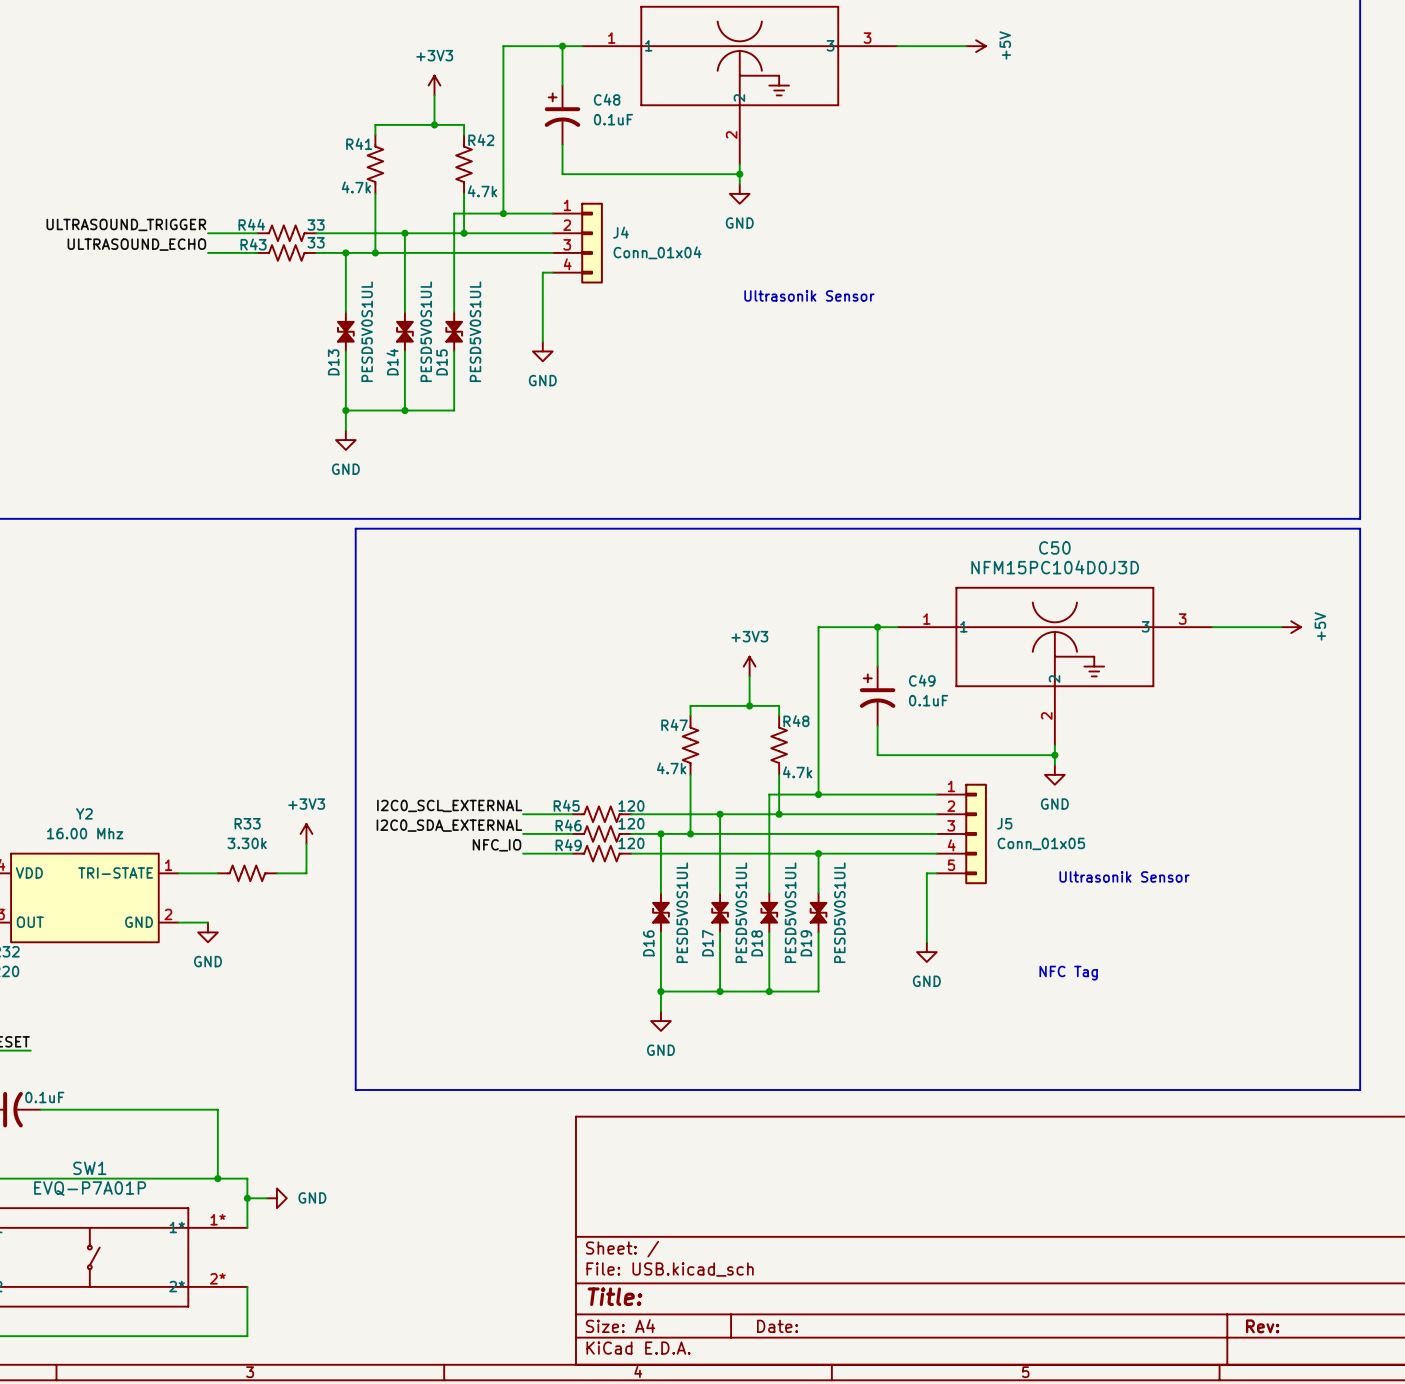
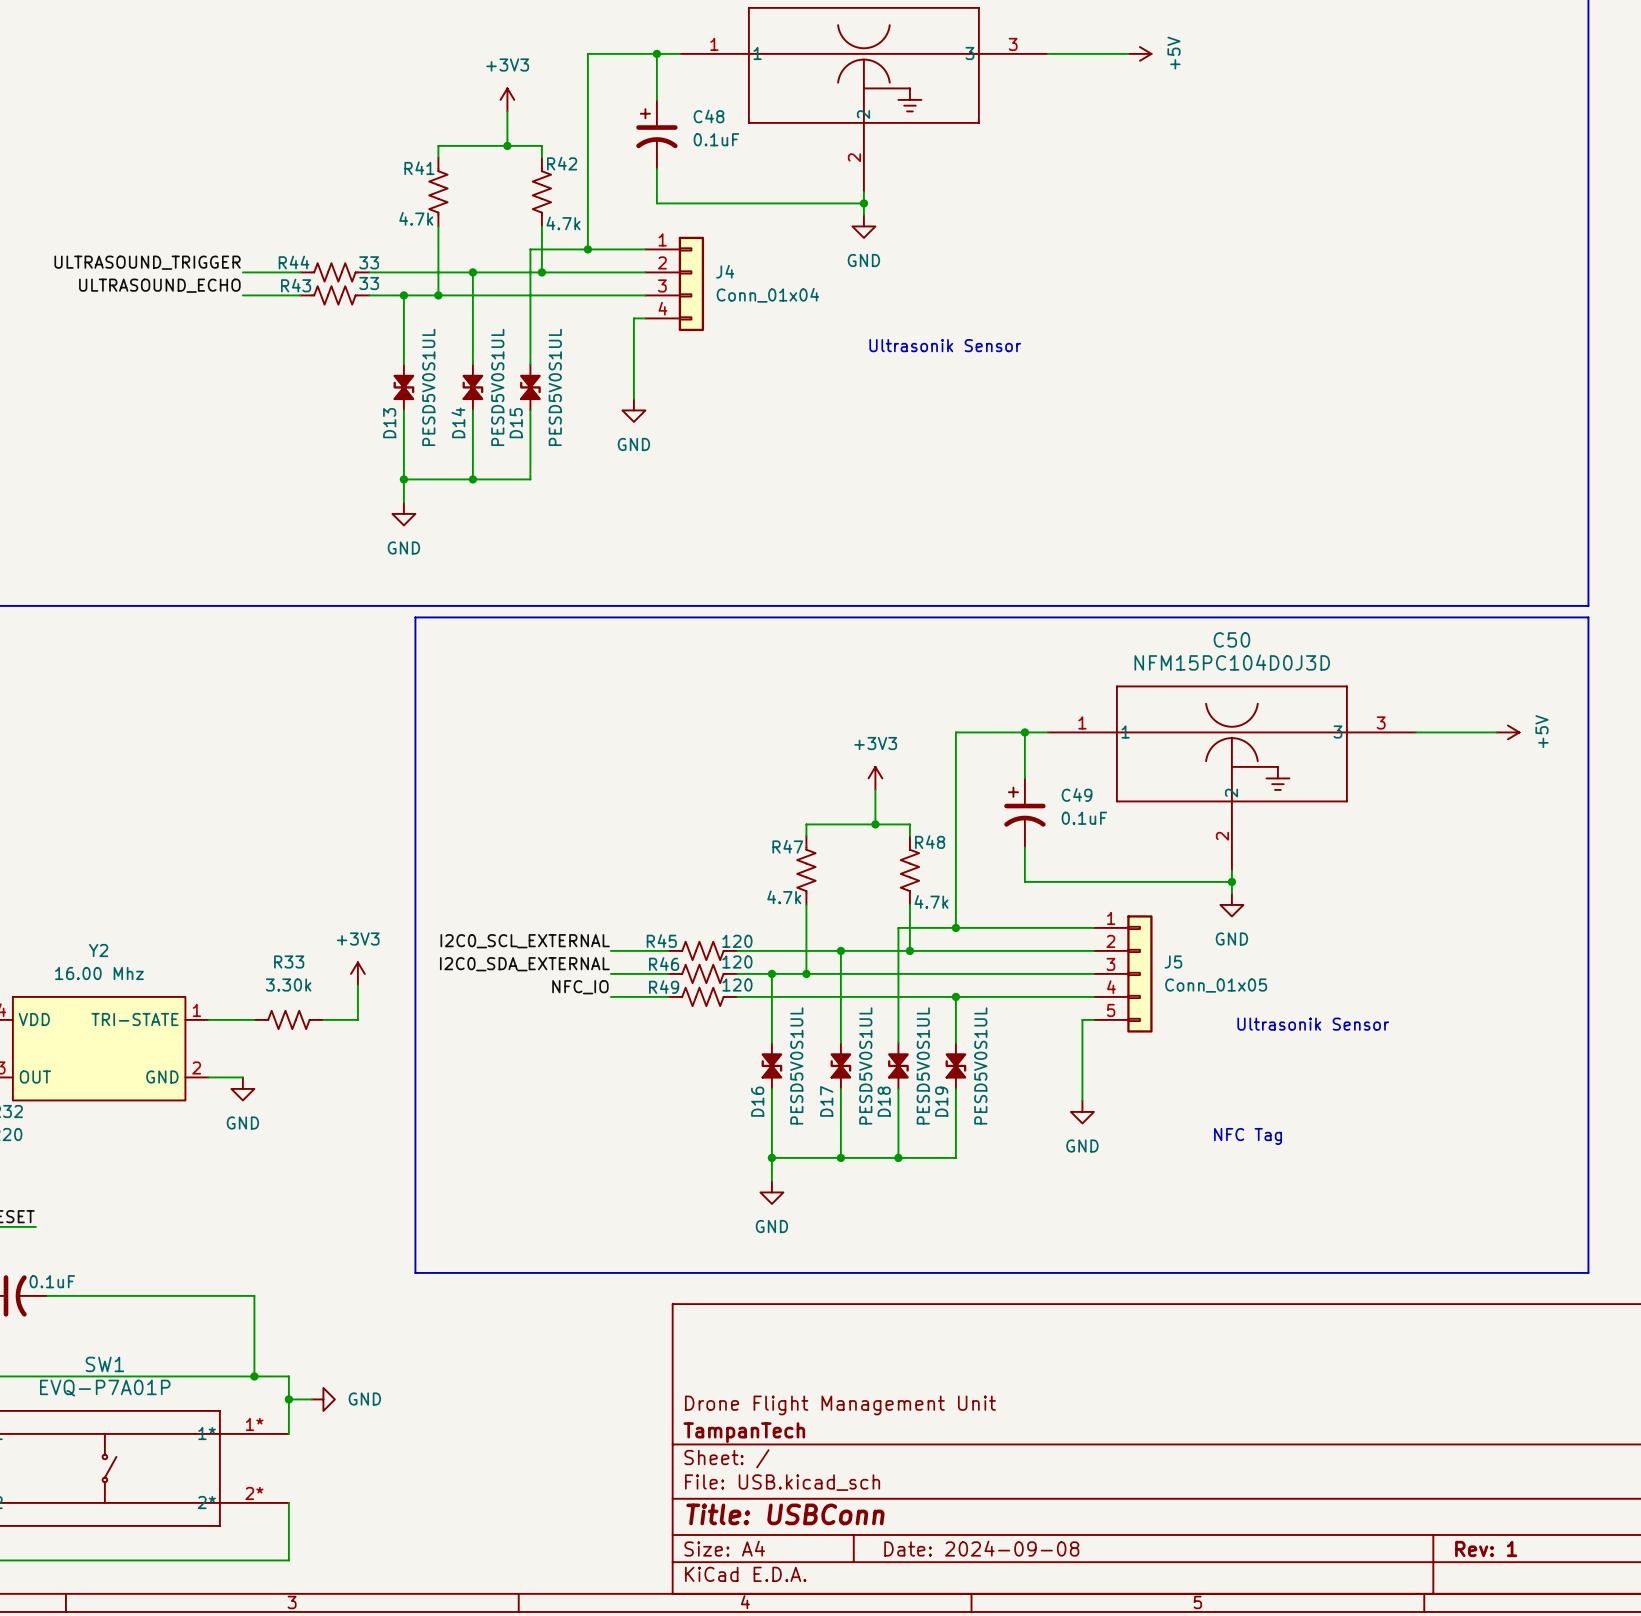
title block: none -> Drone Flight Management Unit (840, 1405)
title block: none -> TampanTech (744, 1432)
title block: Title: (615, 1296) -> Title: USBConn (785, 1514)
title block: Date: (777, 1326) -> Date: 2024-09-08 (981, 1548)
title block: Rev: (1262, 1326) -> Rev: 1 (1486, 1548)

